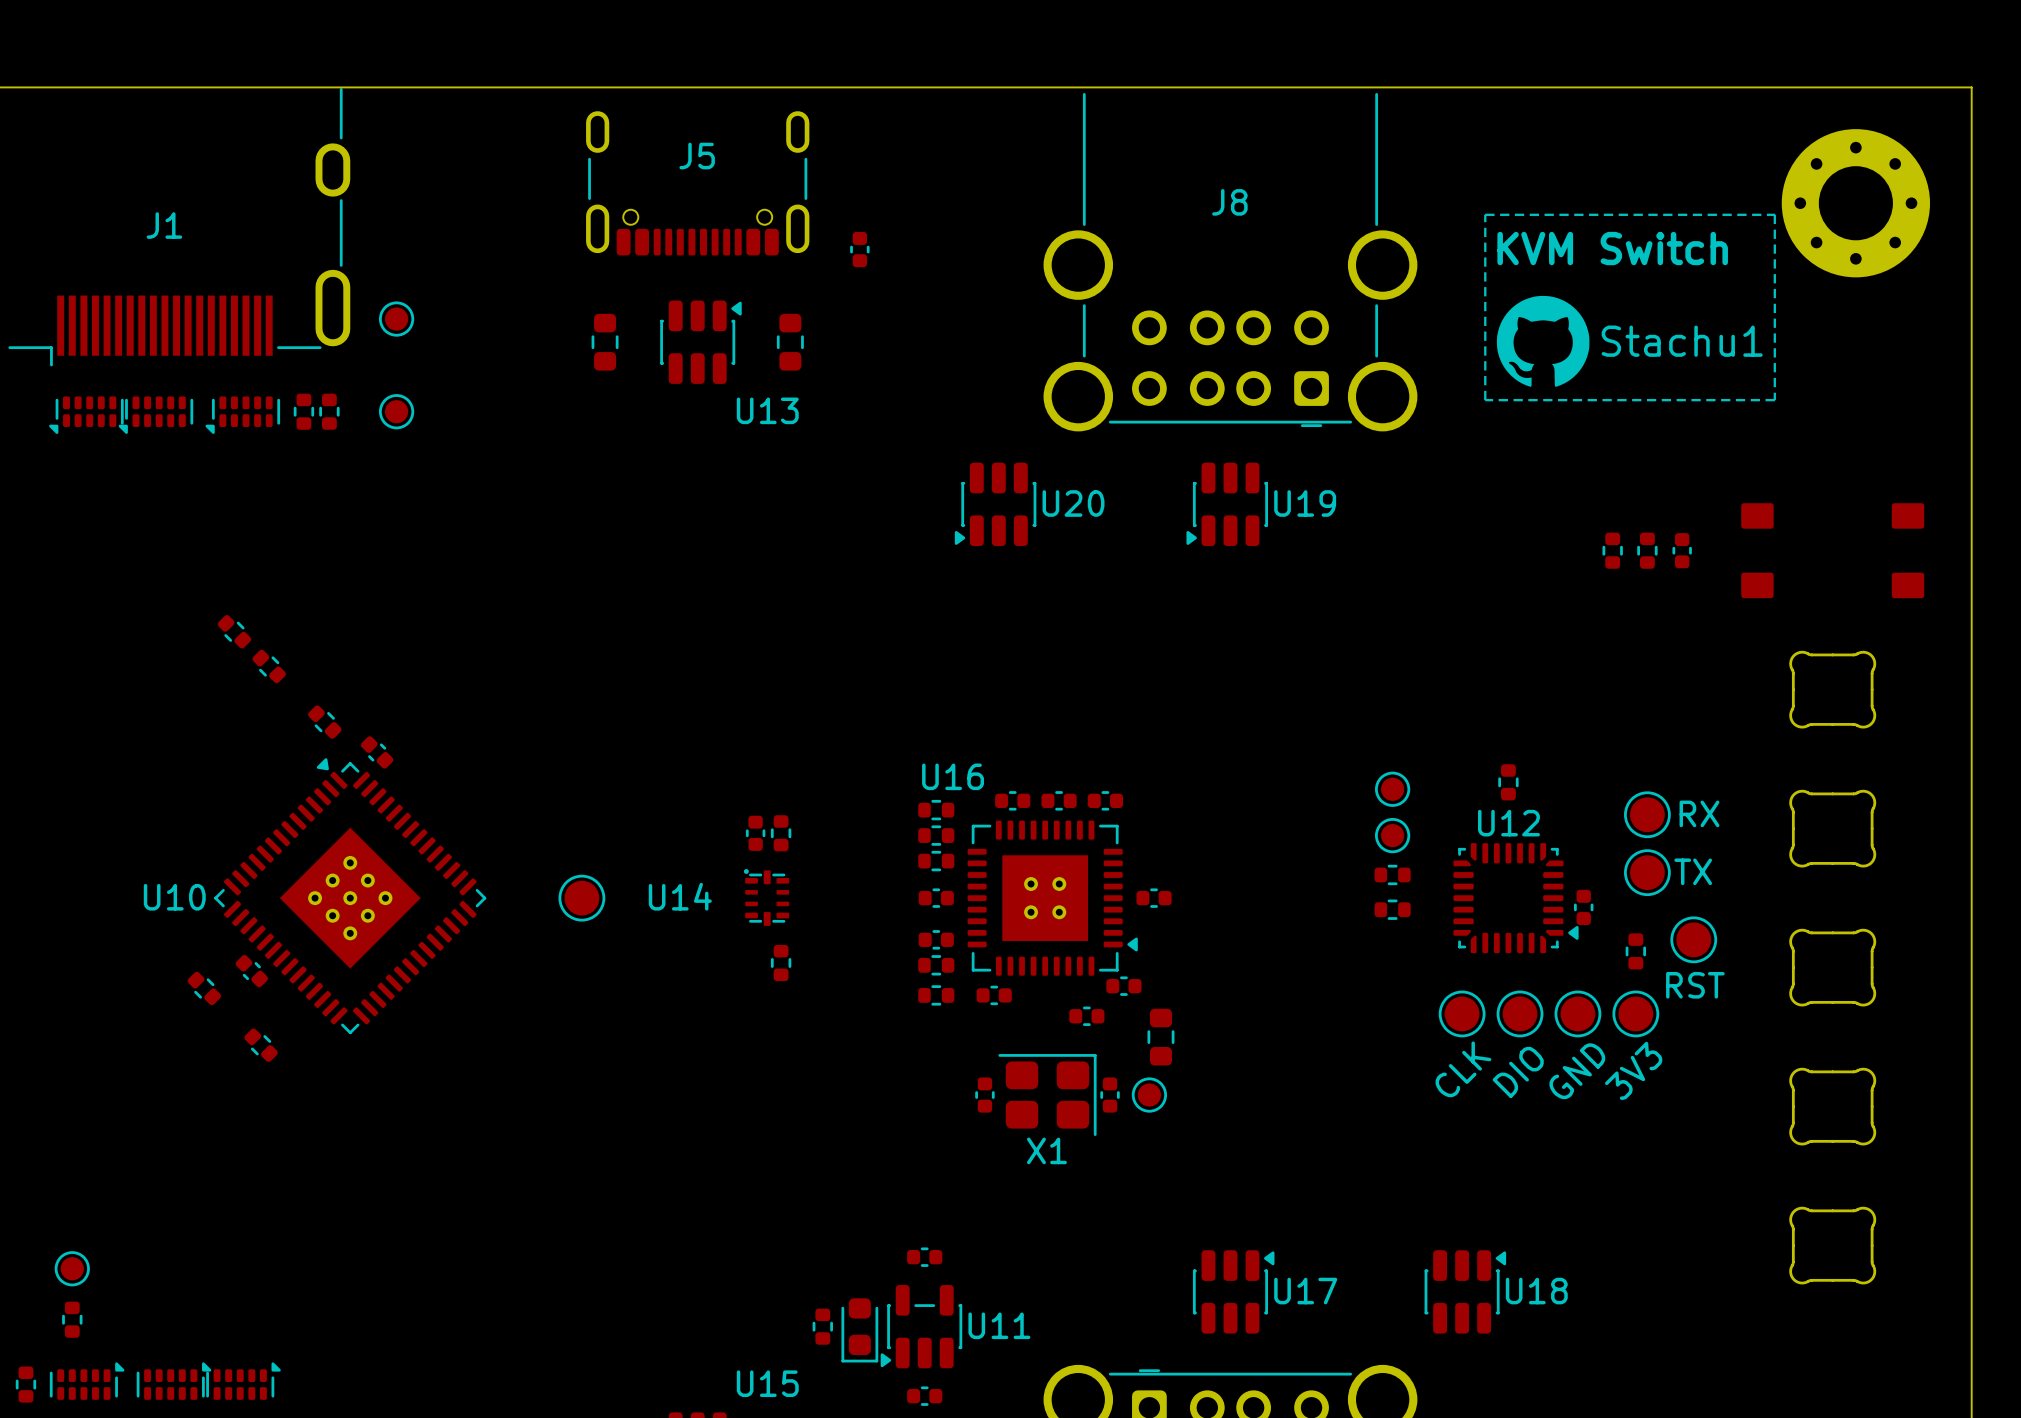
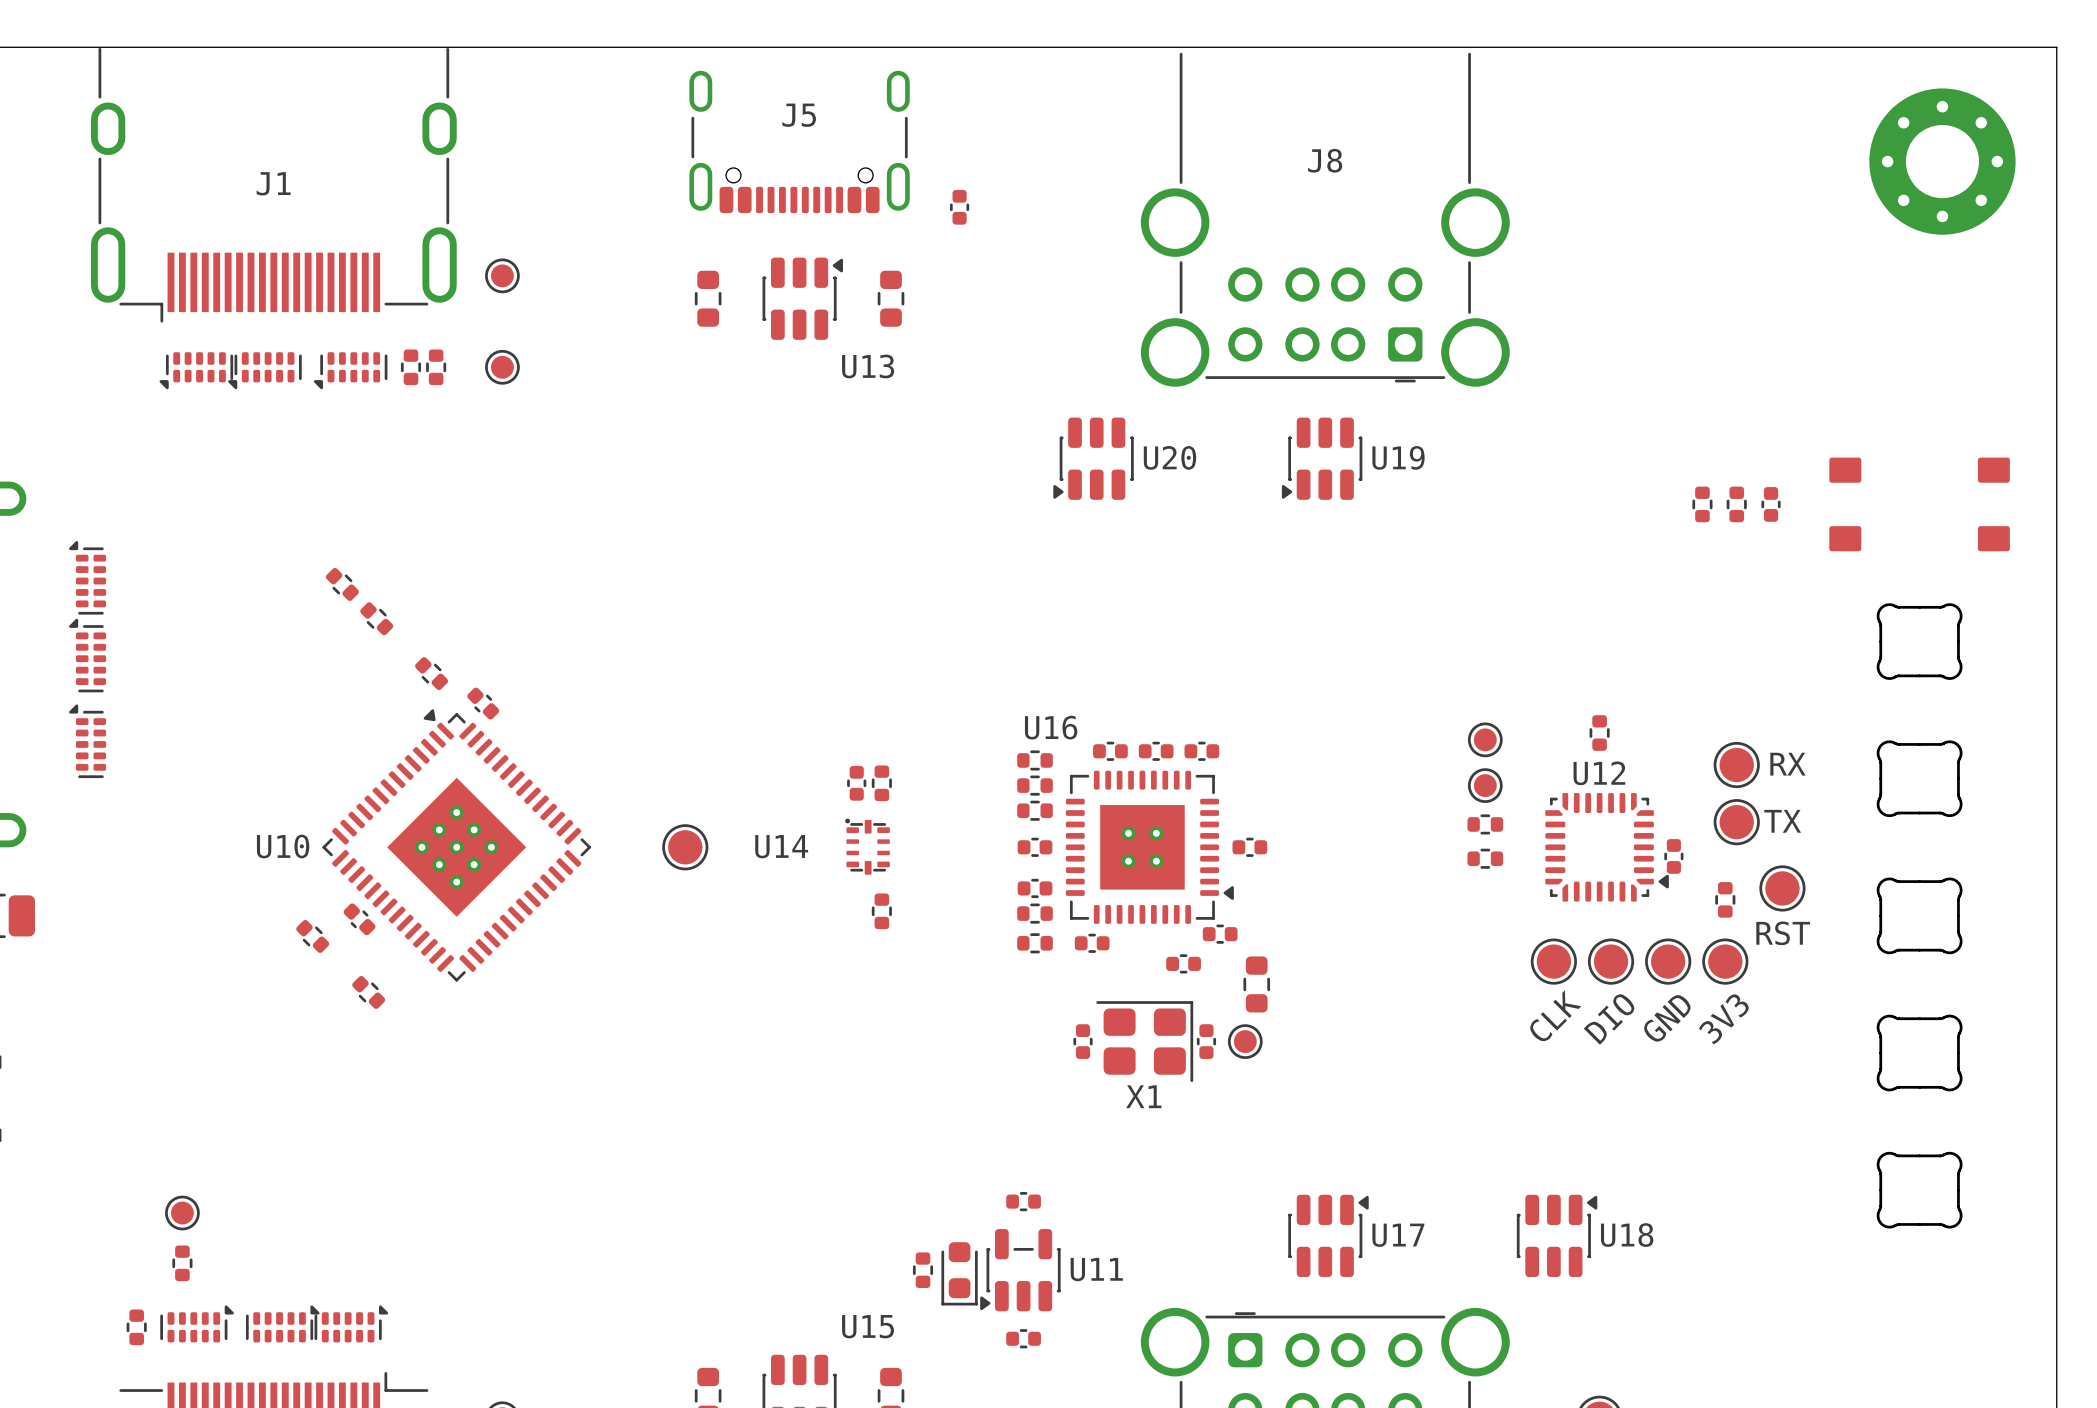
line: (1485, 214) (1774, 214) (1774, 400) (1485, 400) (1485, 214) -> none
text: KVM Switch (1612, 248) -> none
drawing: [1496, 295, 1590, 387] -> none
text: Stachu1 (1682, 341) -> none

